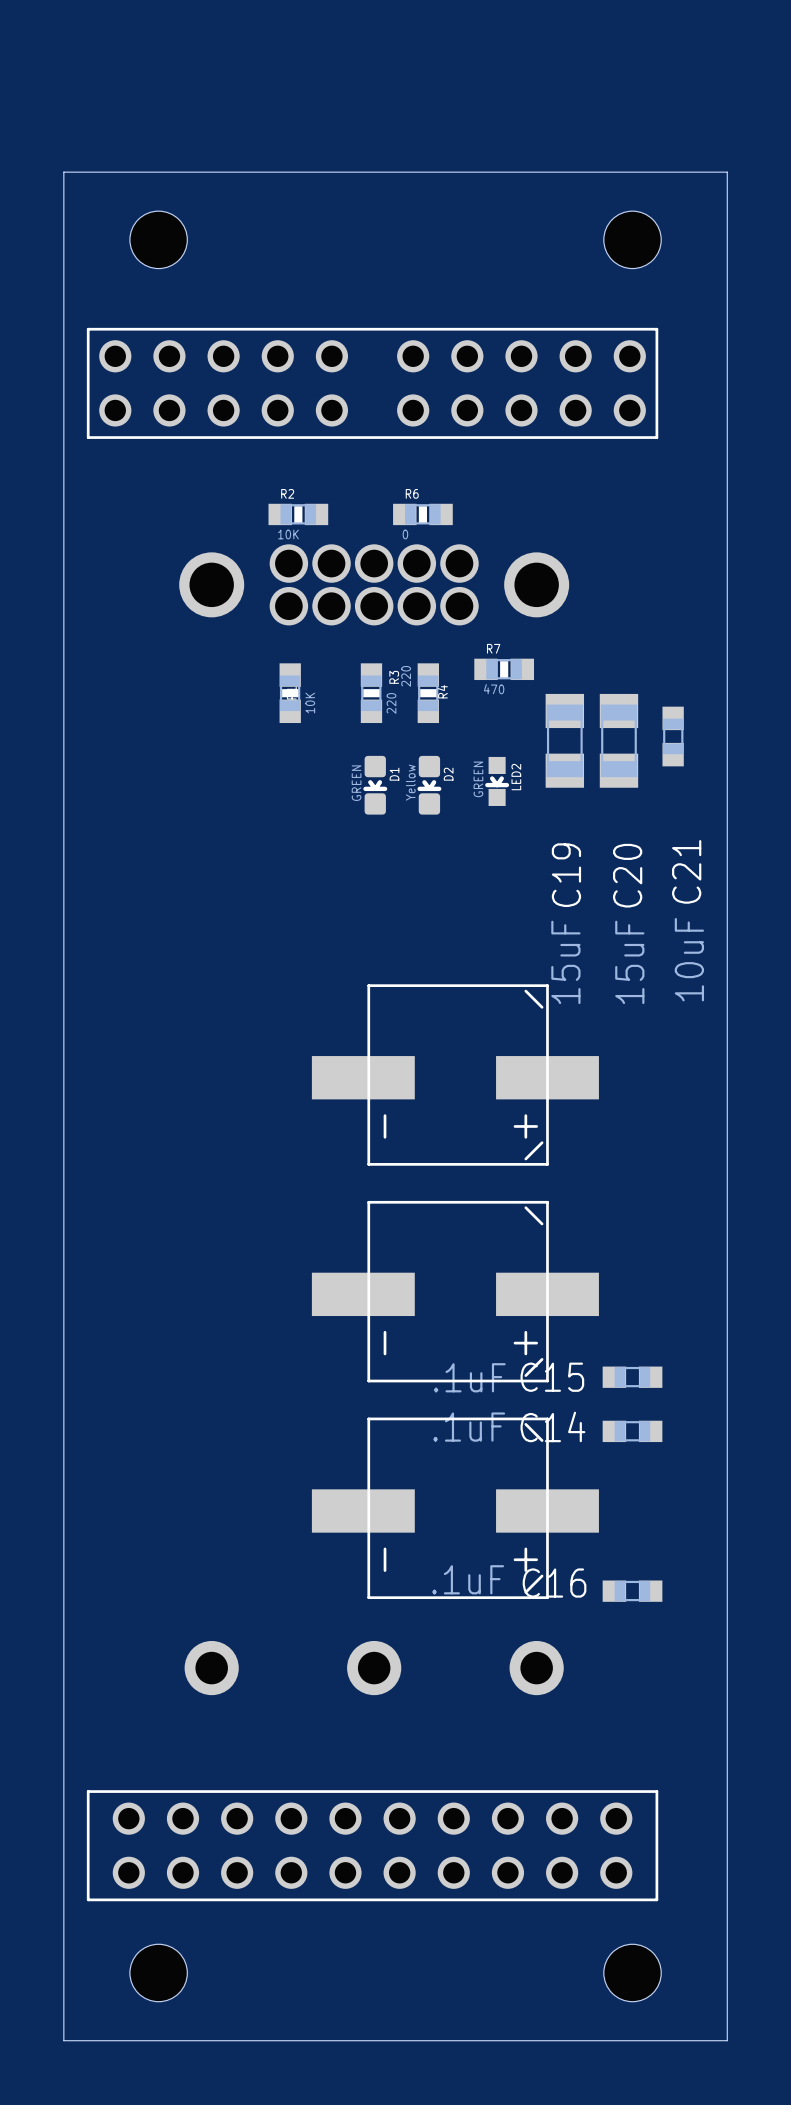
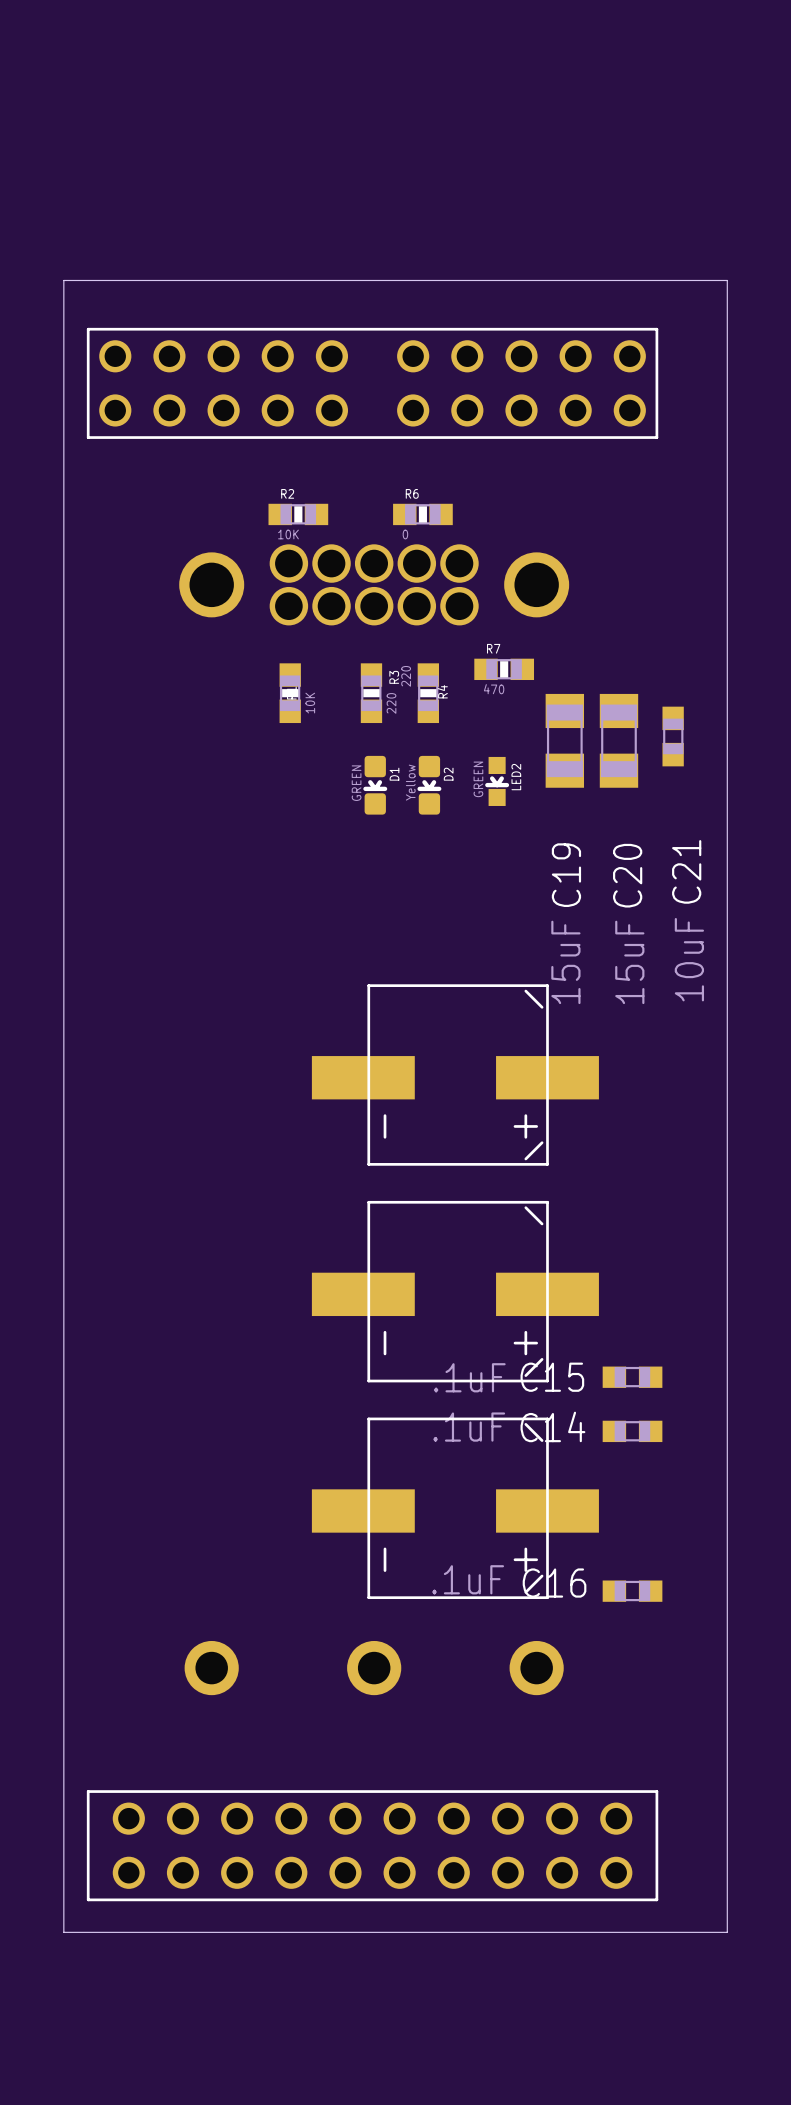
hole: (158, 239) -> none
hole: (632, 239) -> none
board edge: (63, 280) (63, 172) (727, 172) (727, 280) -> (63, 280) (727, 280)
board edge: (63, 1932) (63, 2040) (727, 2040) (727, 1932) -> (63, 1932) (727, 1932)
hole: (158, 1972) -> none
hole: (632, 1972) -> none

